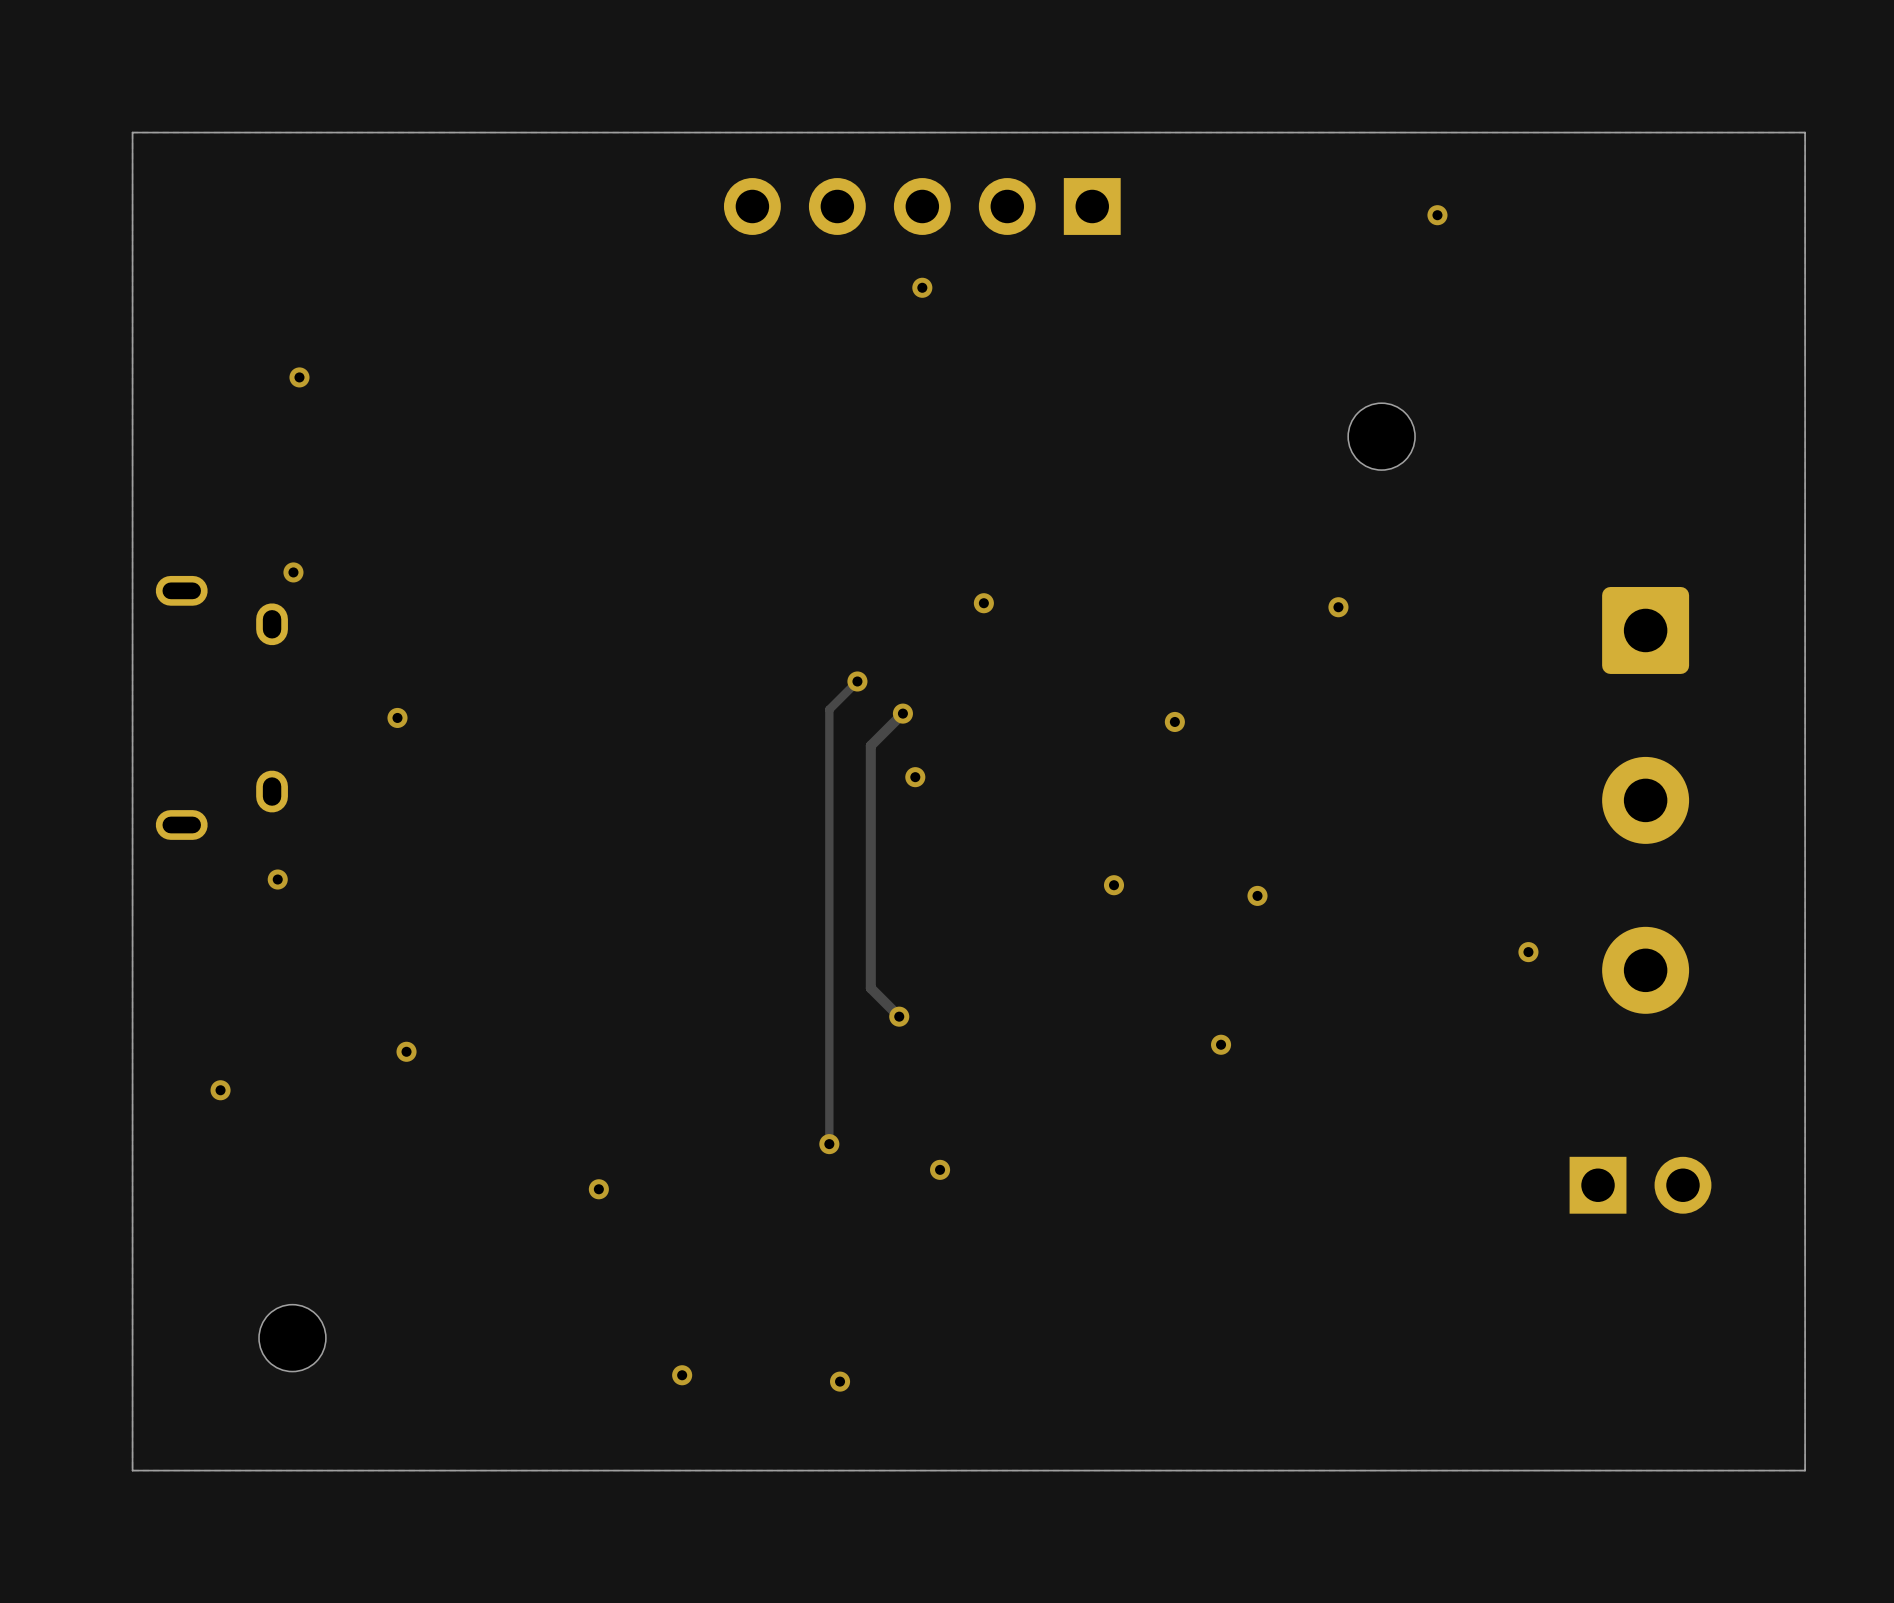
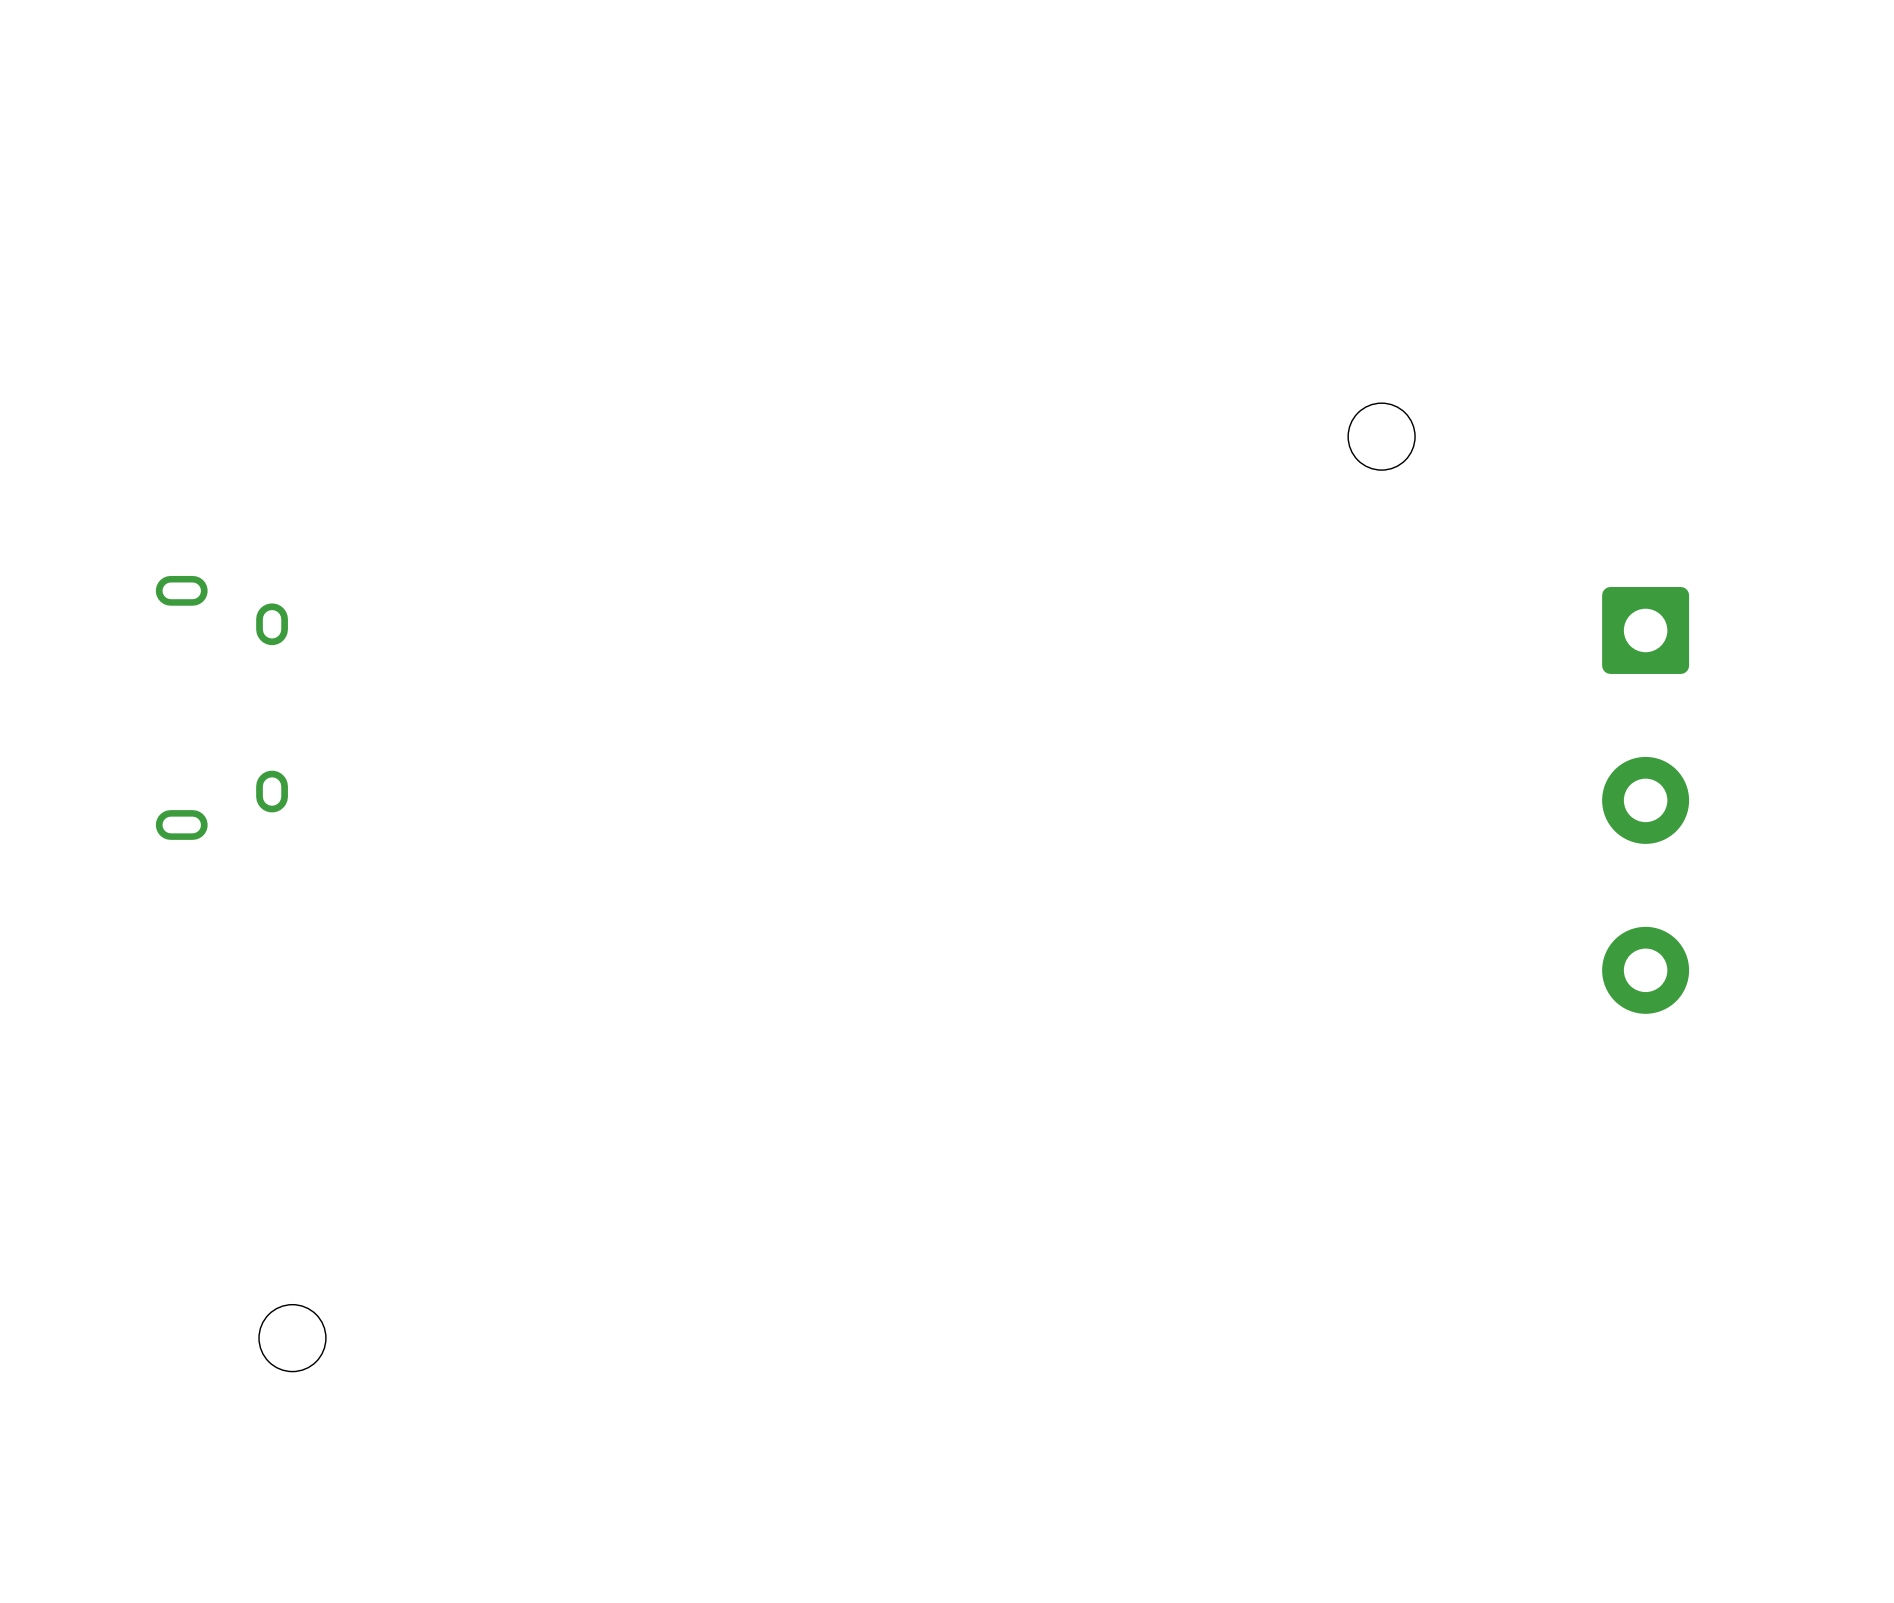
board edge: (1805, 132) (132, 132) (132, 1470) (1805, 1470) (1805, 132) -> none
part: (922, 206) -> none
via: (1437, 215) -> none
via: (922, 287) -> none
via: (299, 377) -> none
via: (293, 572) -> none
via: (983, 603) -> none
via: (1338, 607) -> none
track: (857, 681) (829, 709) (829, 1144) -> none
via: (857, 681) -> none
track: (902, 713) (870, 745) (870, 988) (899, 1016) -> none
via: (902, 713) -> none
via: (397, 717) -> none
via: (1174, 721) -> none
via: (915, 777) -> none
via: (277, 879) -> none
via: (1114, 885) -> none
via: (1257, 895) -> none
via: (1528, 952) -> none
via: (899, 1016) -> none
via: (1221, 1044) -> none
via: (406, 1051) -> none
via: (220, 1090) -> none
via: (829, 1144) -> none
via: (940, 1169) -> none
part: (1640, 1185) -> none
via: (598, 1189) -> none
via: (682, 1375) -> none
via: (840, 1381) -> none

